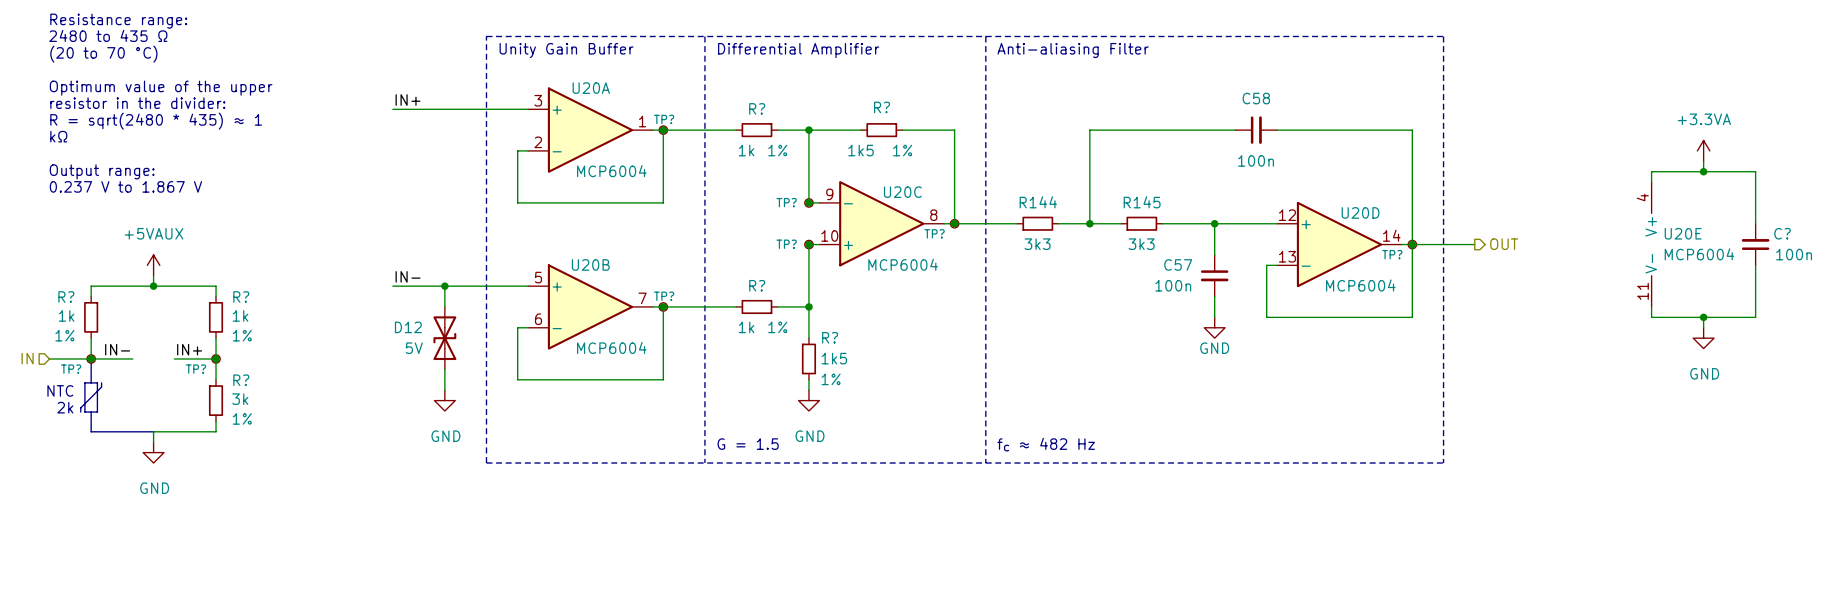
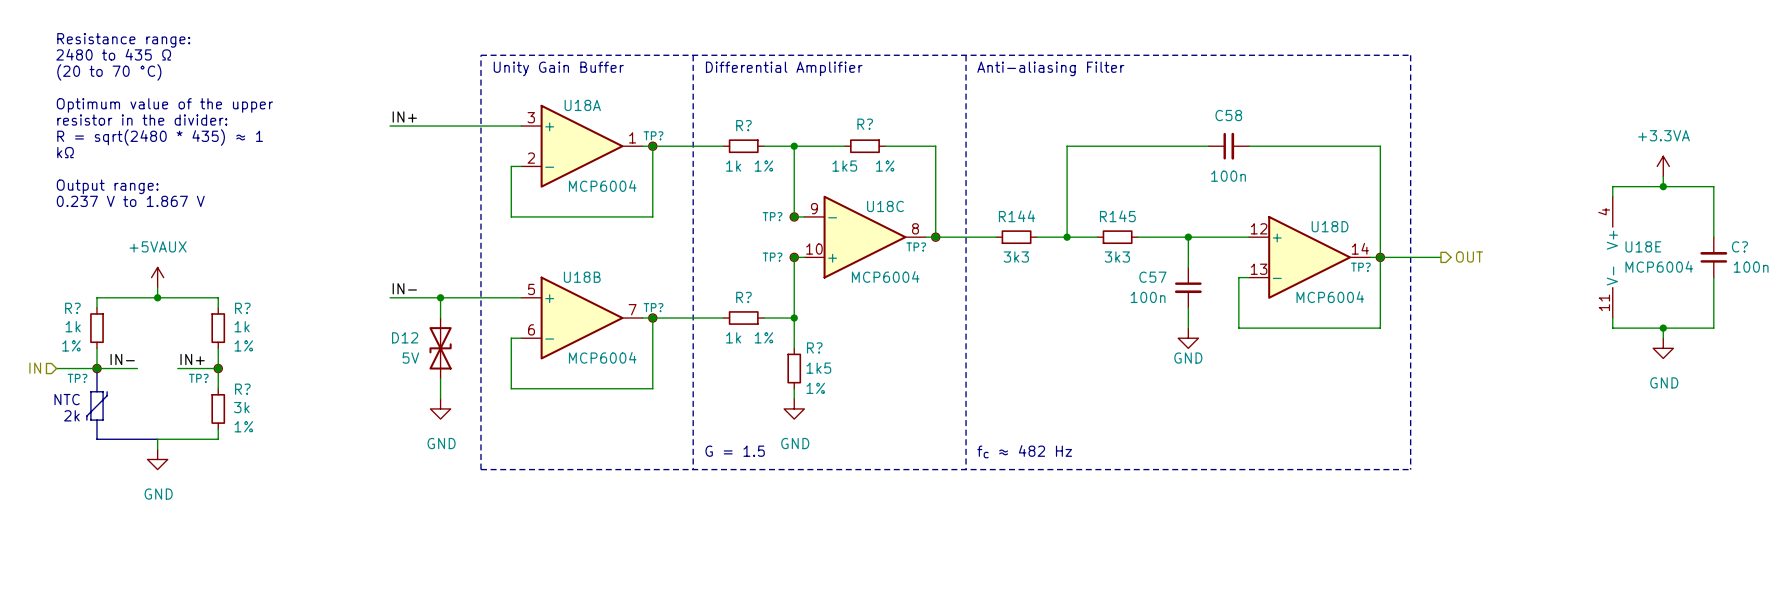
U20A name: U20A (591, 88) -> U18A (582, 105)
U20C name: U20C (902, 192) -> U18C (885, 206)
U20D name: U20D (1360, 212) -> U18D (1330, 226)
U20E name: U20E (1683, 233) -> U18E (1643, 246)
U20B name: U20B (590, 264) -> U18B (582, 277)

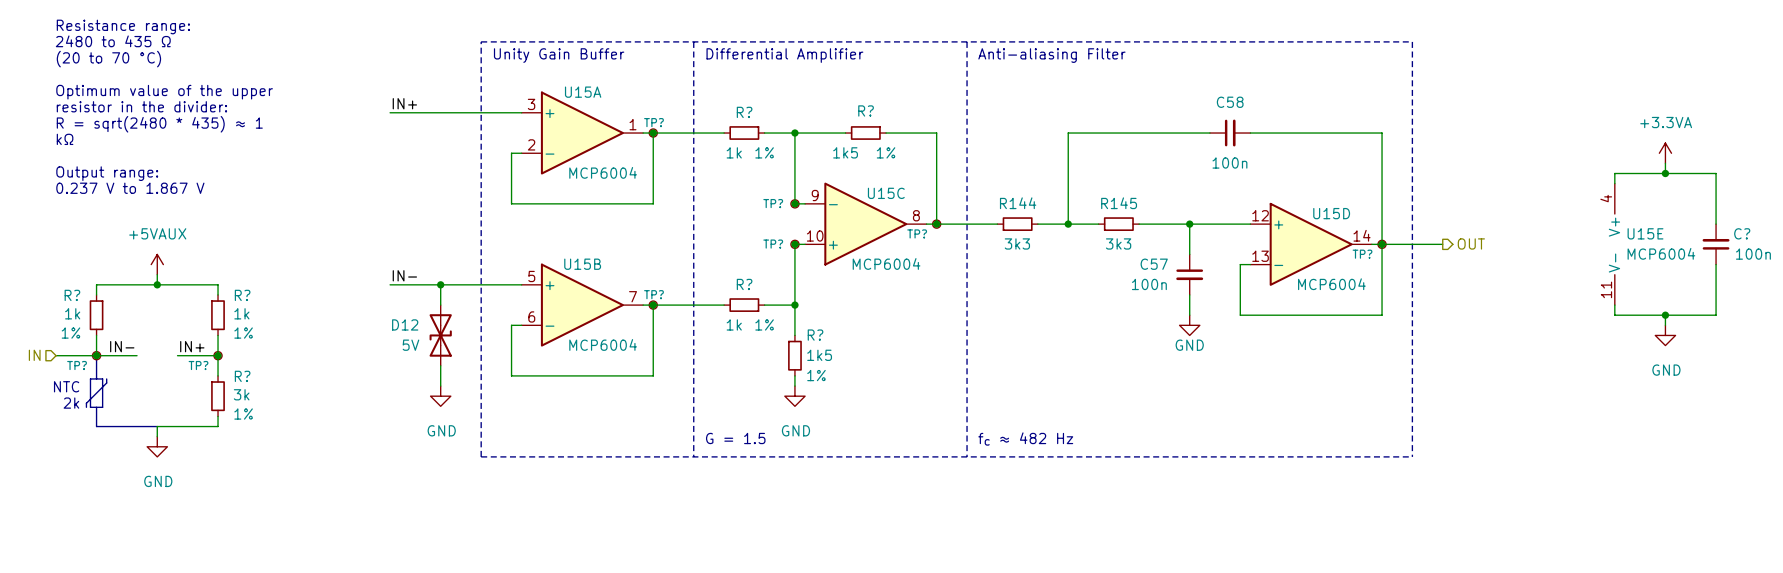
U18A name: U18A (582, 105) -> U15A (583, 92)
U18C name: U18C (885, 206) -> U15C (886, 193)
U18D name: U18D (1330, 226) -> U15D (1331, 213)
U18E name: U18E (1643, 246) -> U15E (1645, 233)
U18B name: U18B (582, 277) -> U15B (582, 264)

